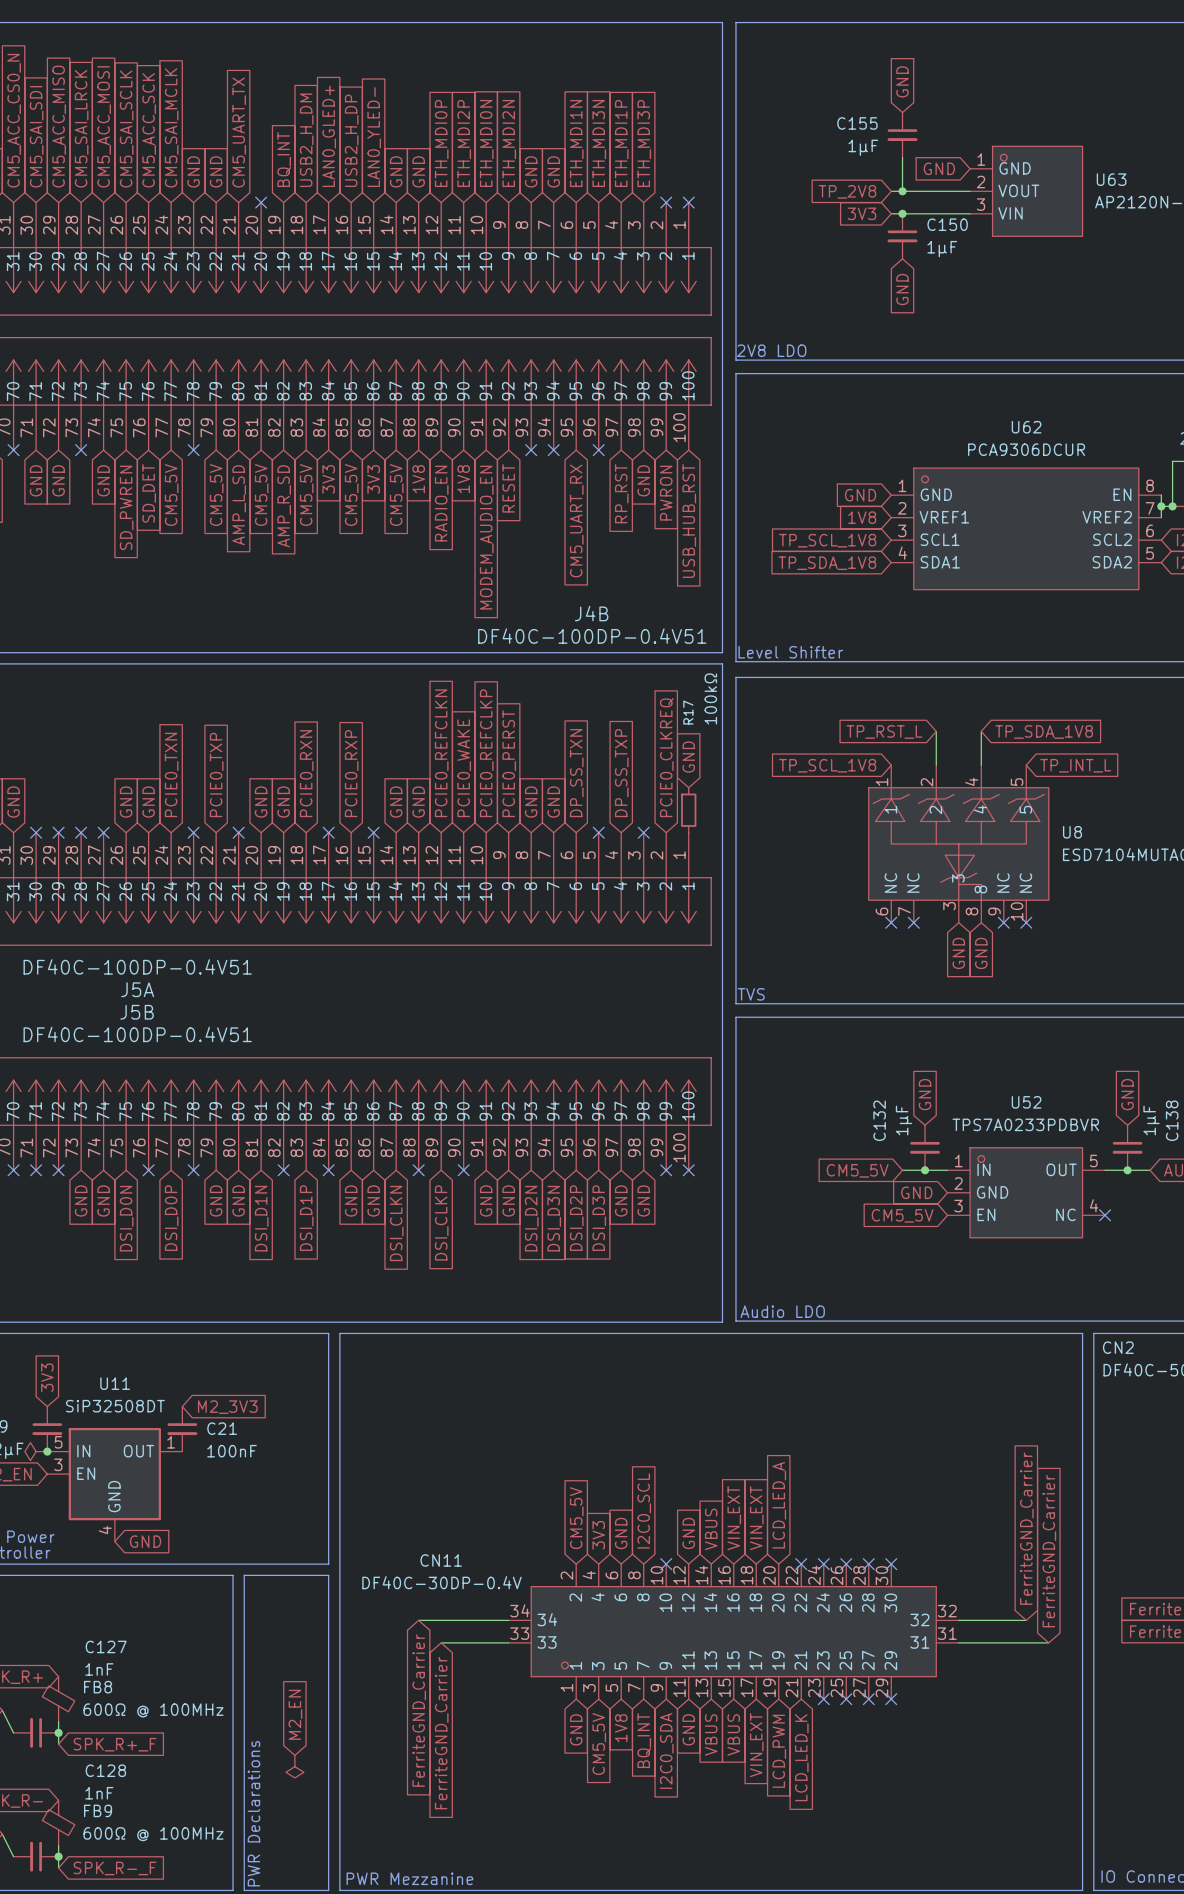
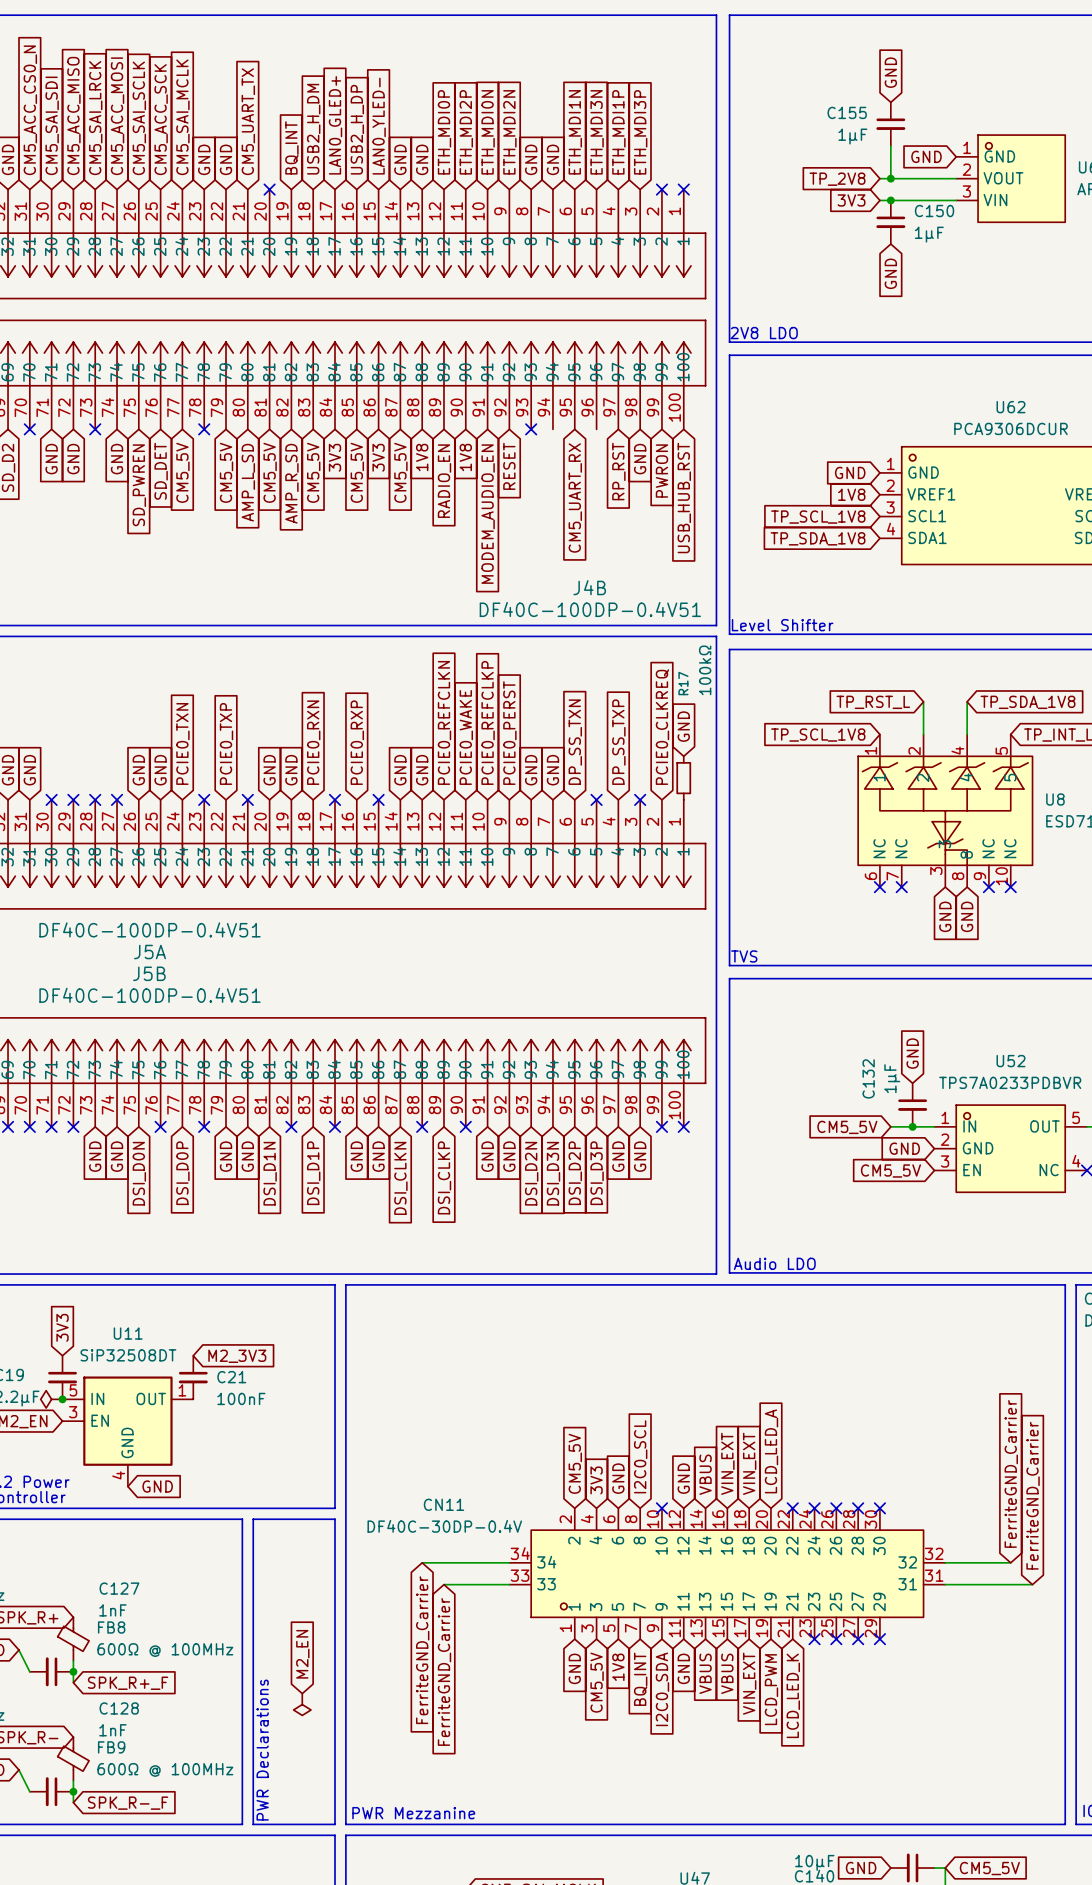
no-connect mark: (553, 450) -> none
no-connect mark: (598, 450) -> none

